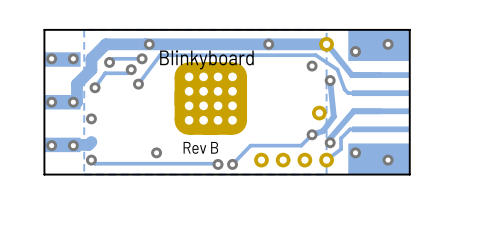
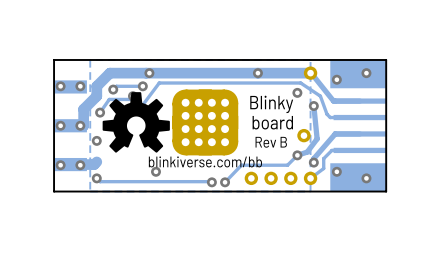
text: Blinkyboard (206, 59) -> Blinky (271, 104)
drawing: none -> [102, 92, 170, 153]
text: none -> board (272, 122)
text: none -> Rev B (271, 142)
text: Rev B (200, 147) -> blinkiverse.com/bb (205, 161)

